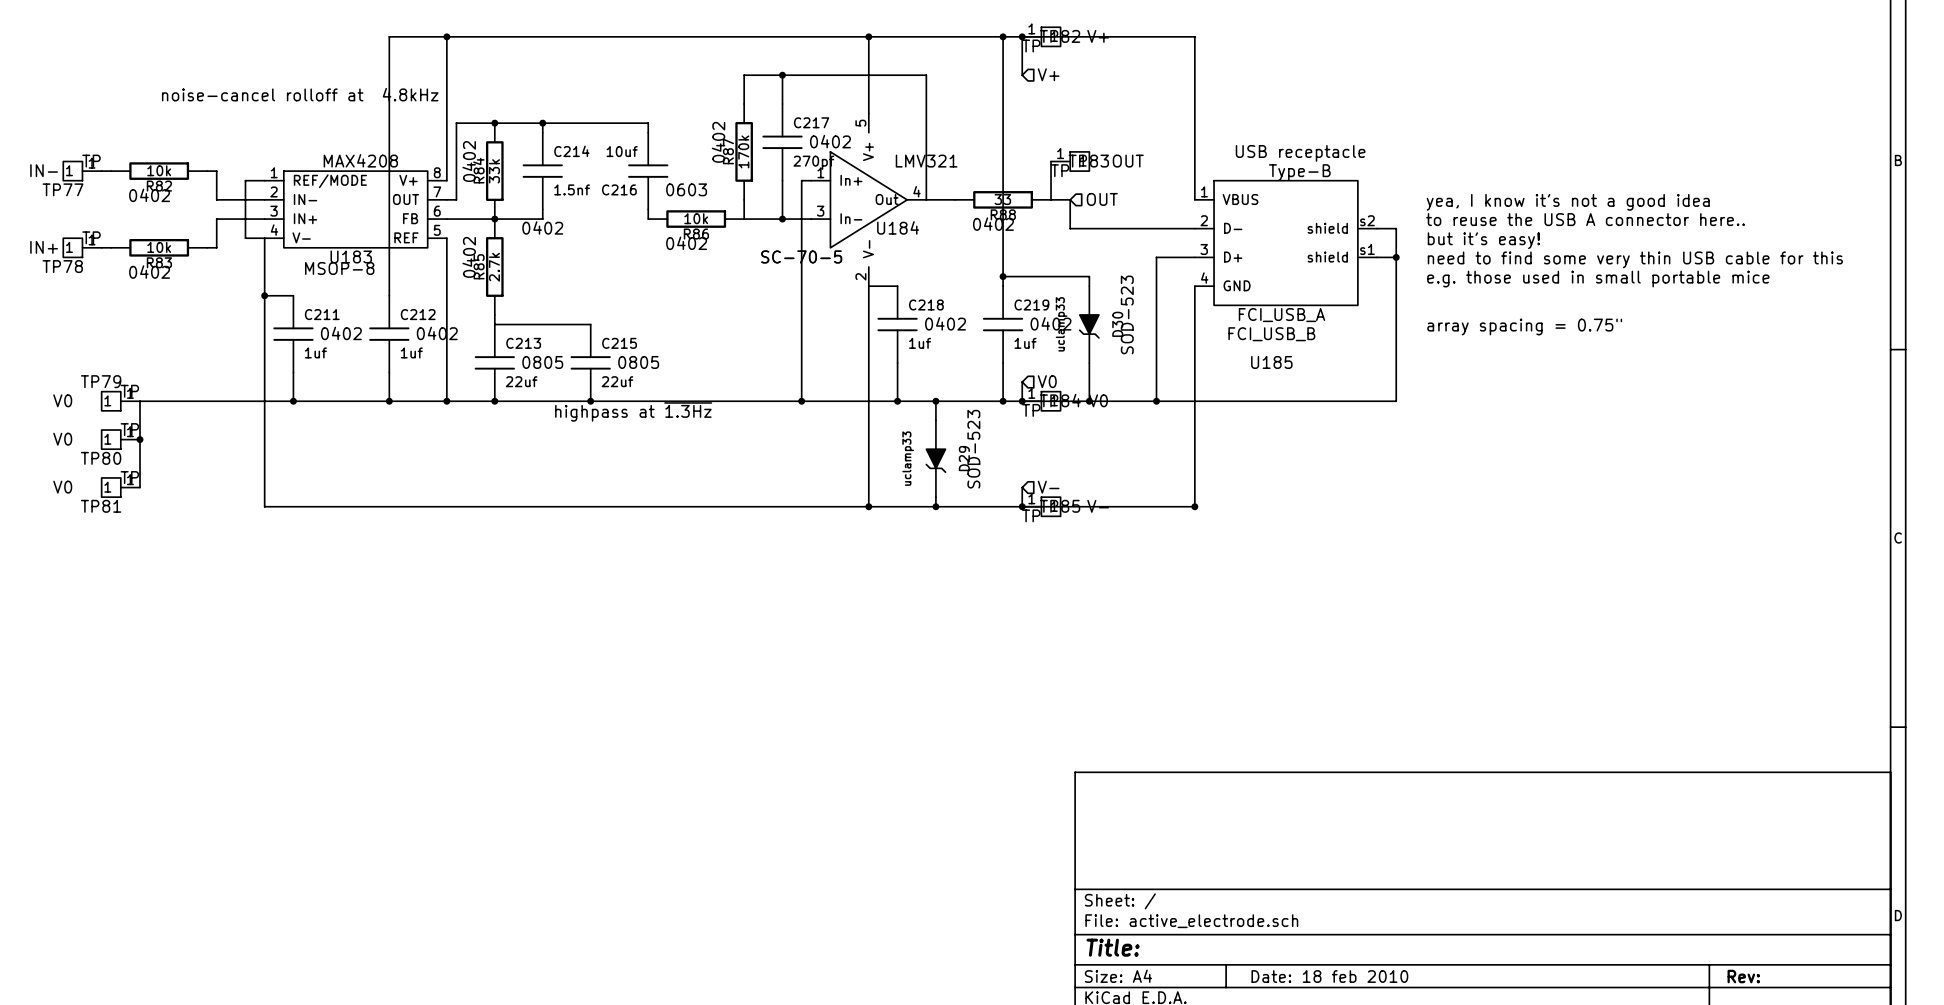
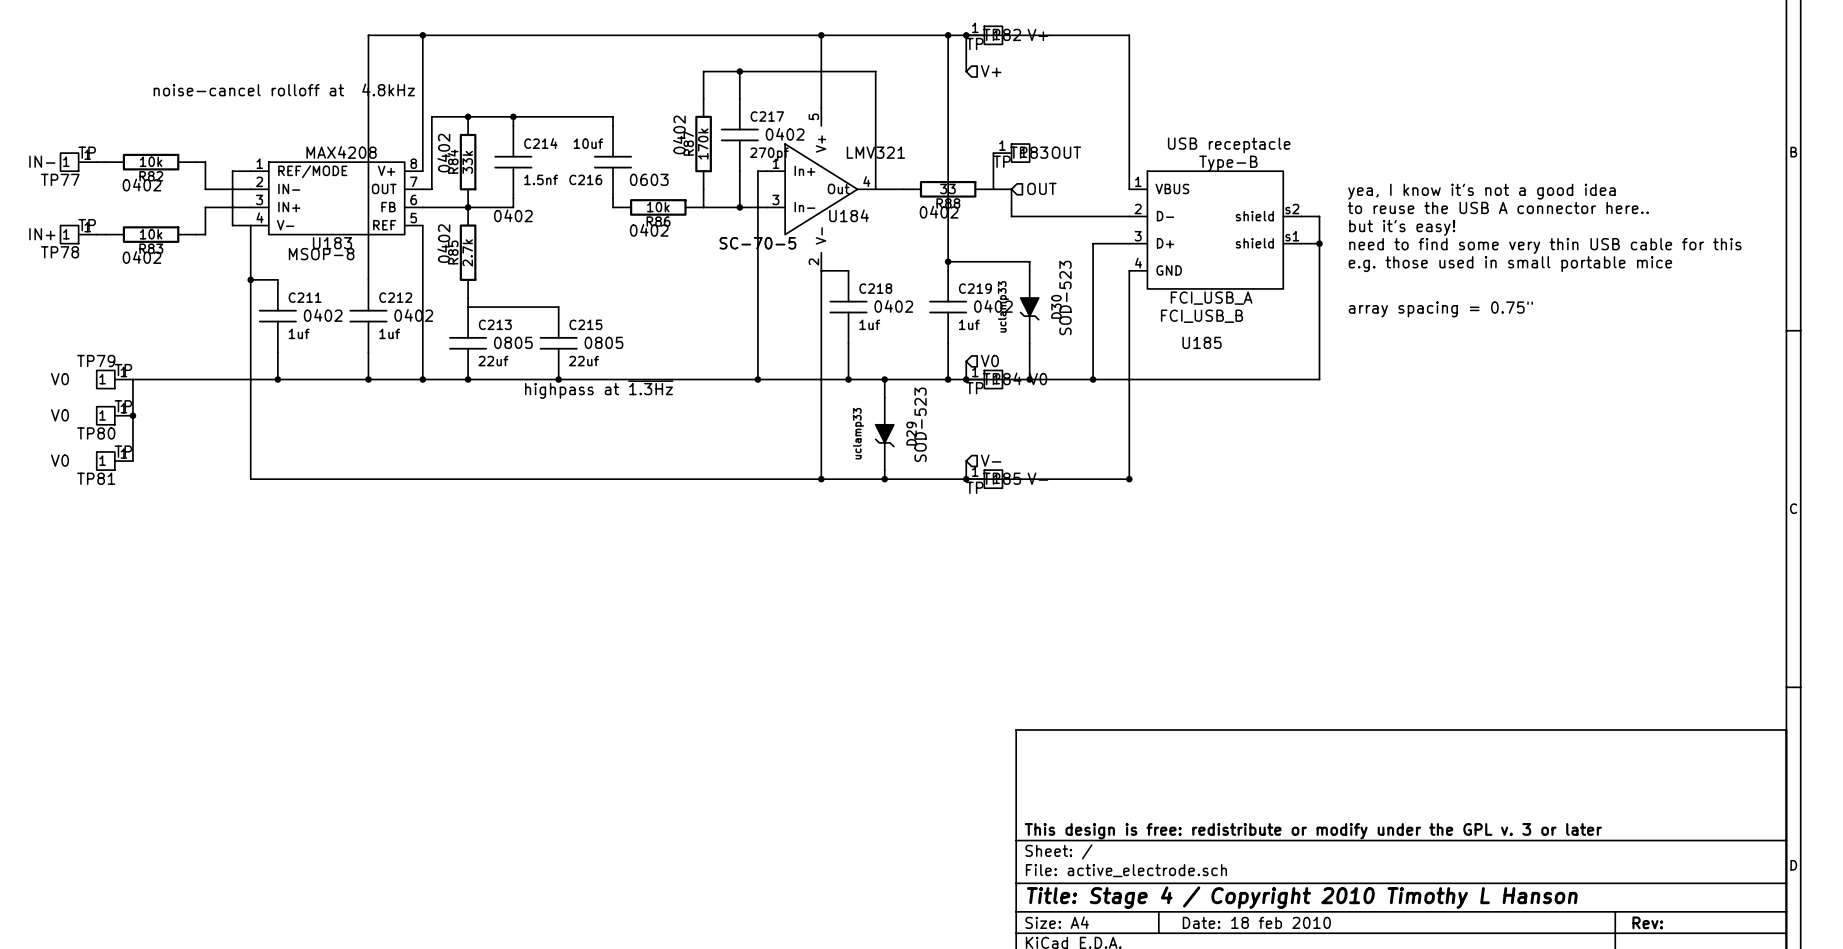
title block: none -> This design is free: redistribute or modify under the GPL v. 3 or later (1313, 831)
title block: Title: (1113, 947) -> Title: Stage 4 / Copyright 2010 Timothy L Hanson (1302, 897)

